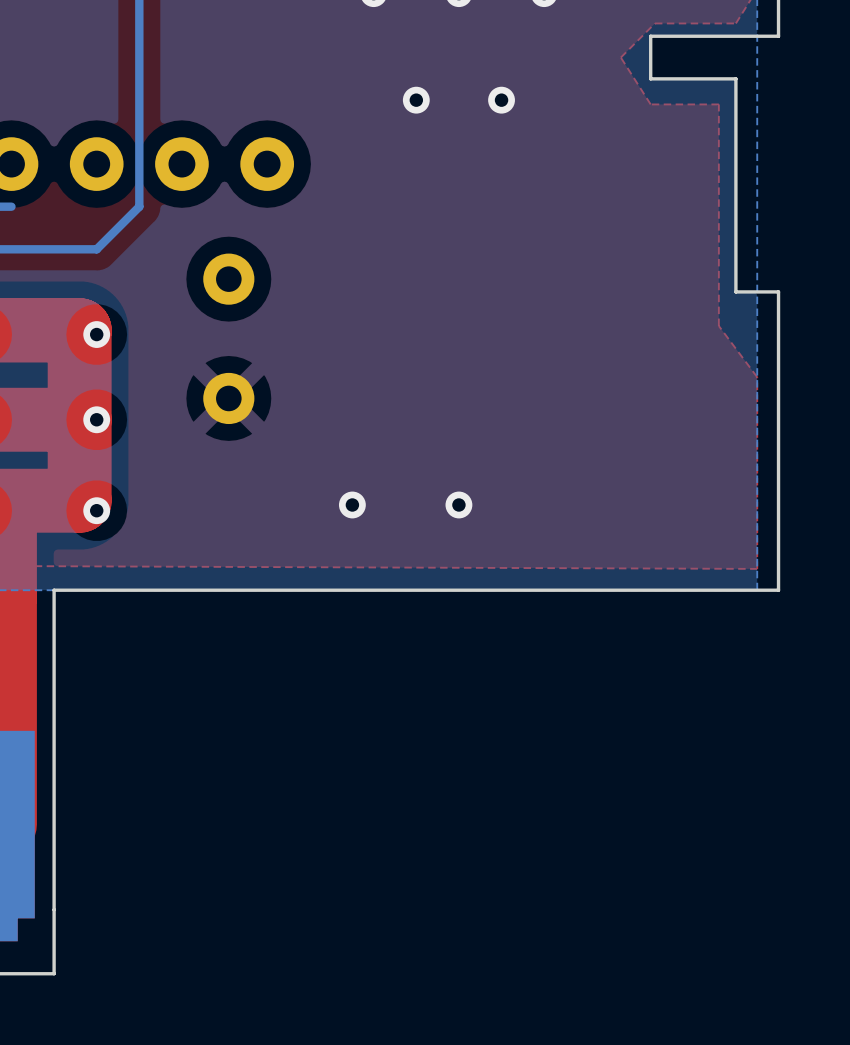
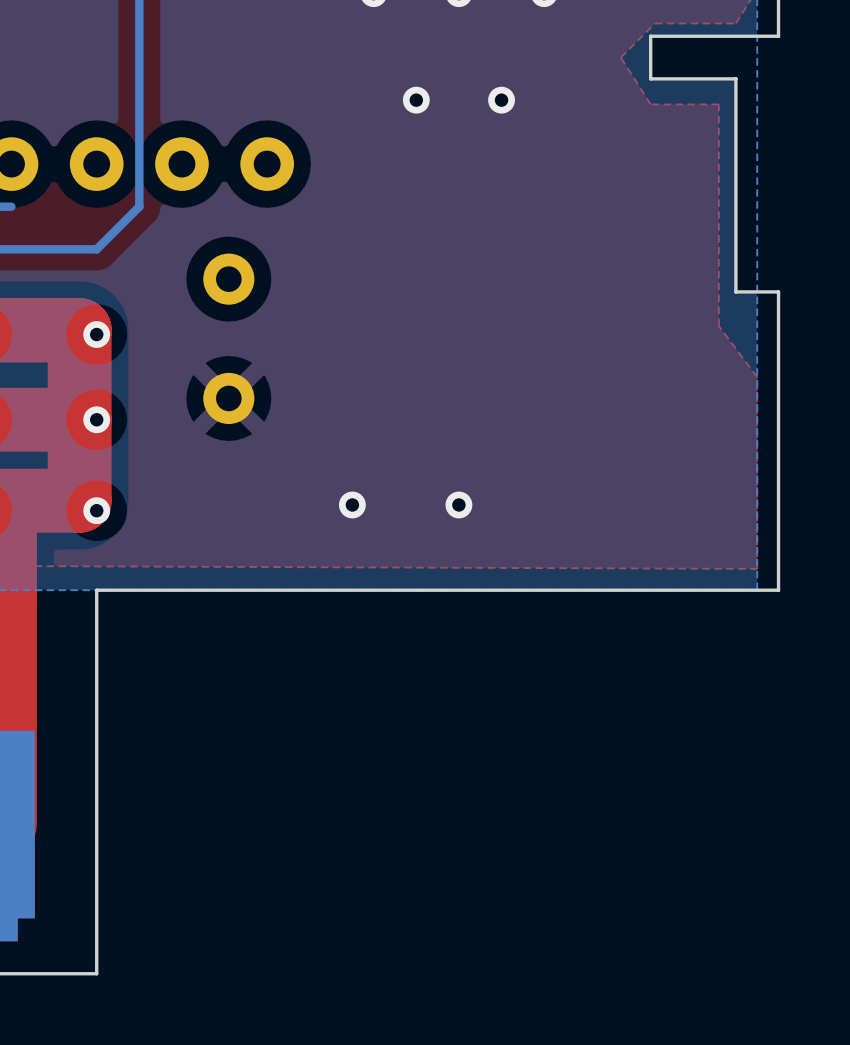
board edge: (96, 590) (54, 590) (54, 973) -> (96, 590) (96, 973) (54, 973)

